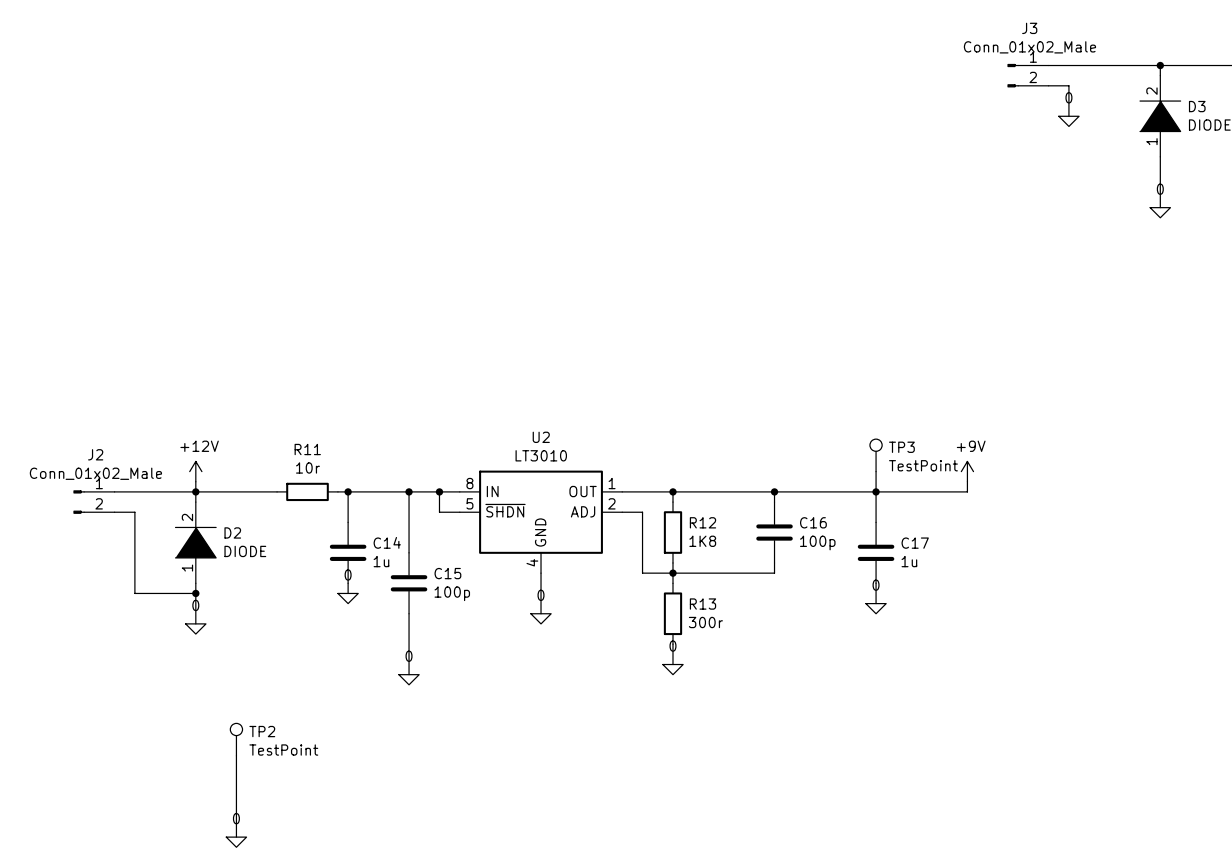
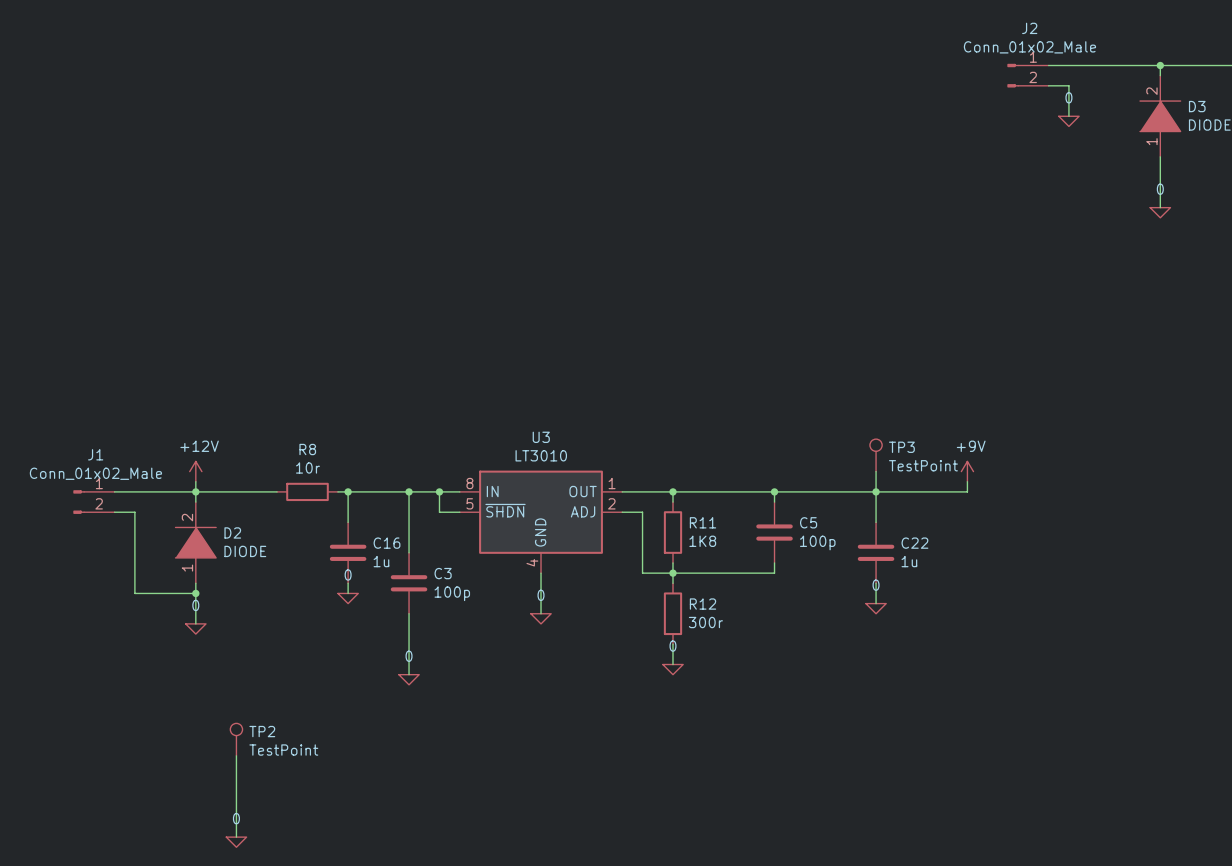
J3 name: J3 (1029, 28) -> J2 (1029, 28)
U2 name: U2 (541, 437) -> U3 (541, 437)
R11 name: R11 (307, 449) -> R8 (307, 449)
J2 name: J2 (95, 454) -> J1 (95, 454)
R12 name: R12 (703, 522) -> R11 (703, 522)
C16 name: C16 (813, 522) -> C5 (808, 522)
C14 name: C14 (387, 542) -> C16 (387, 543)
C17 name: C17 (915, 543) -> C22 (914, 543)
C15 name: C15 (447, 573) -> C3 (443, 573)
R13 name: R13 (703, 604) -> R12 (703, 604)

